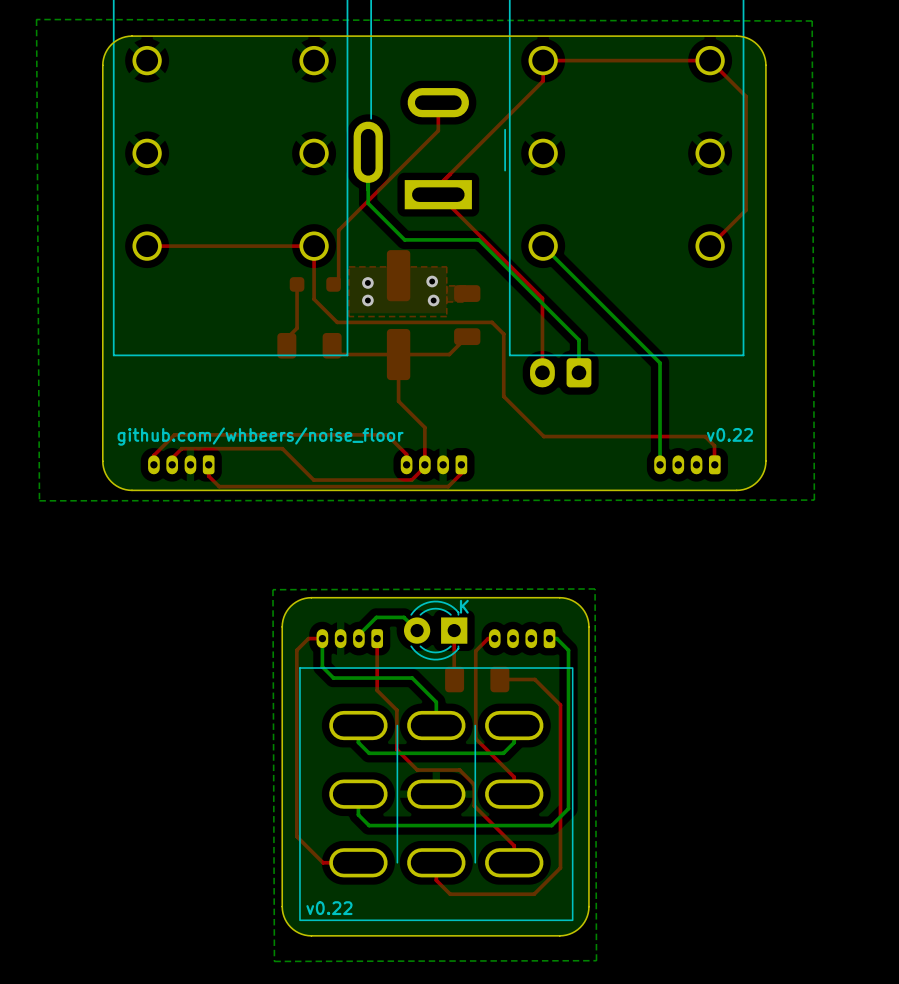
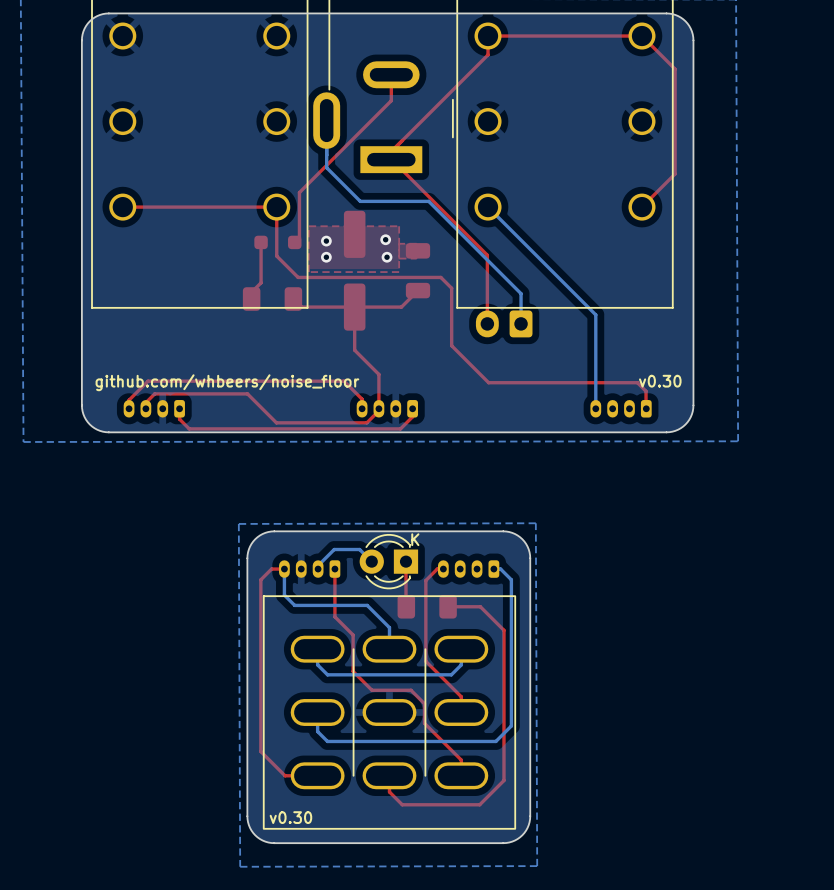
text: github.com/whbeers/noise_floor v0.22 (435, 436) -> github.com/whbeers/noise_floor v0.30 (388, 382)
text: v0.22 (329, 908) -> v0.30 (290, 817)

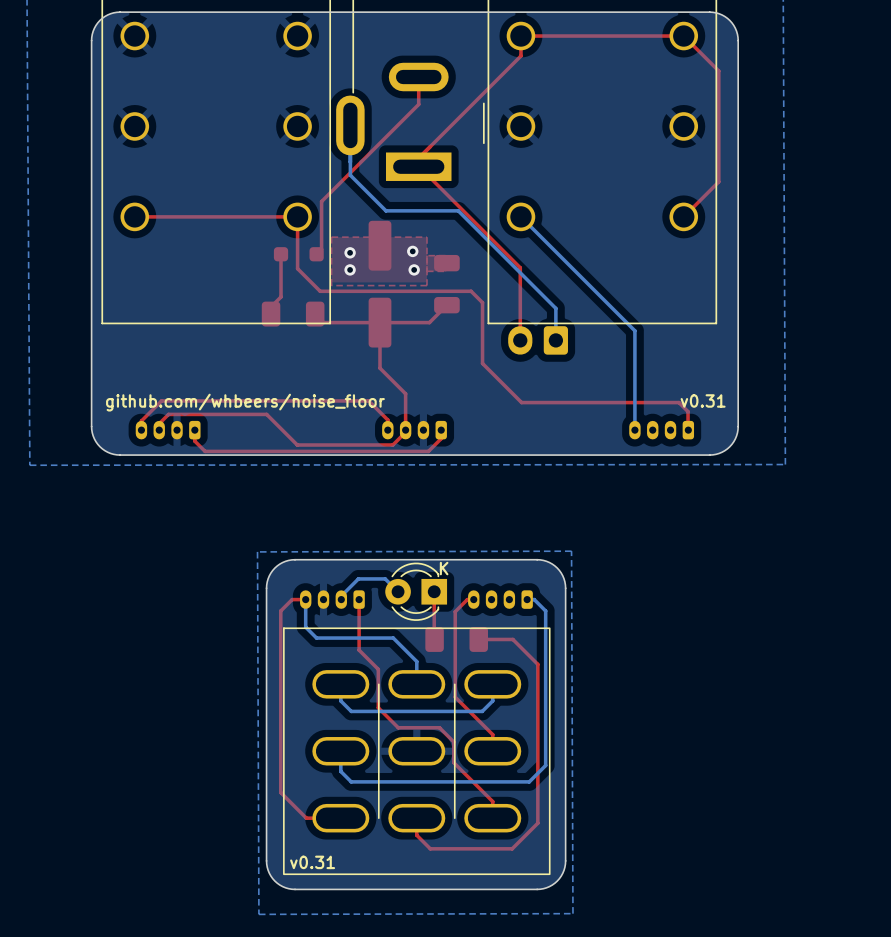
text: github.com/whbeers/noise_floor v0.30 (388, 382) -> github.com/whbeers/noise_floor v0.31 (415, 402)
text: v0.30 (290, 817) -> v0.31 (312, 862)

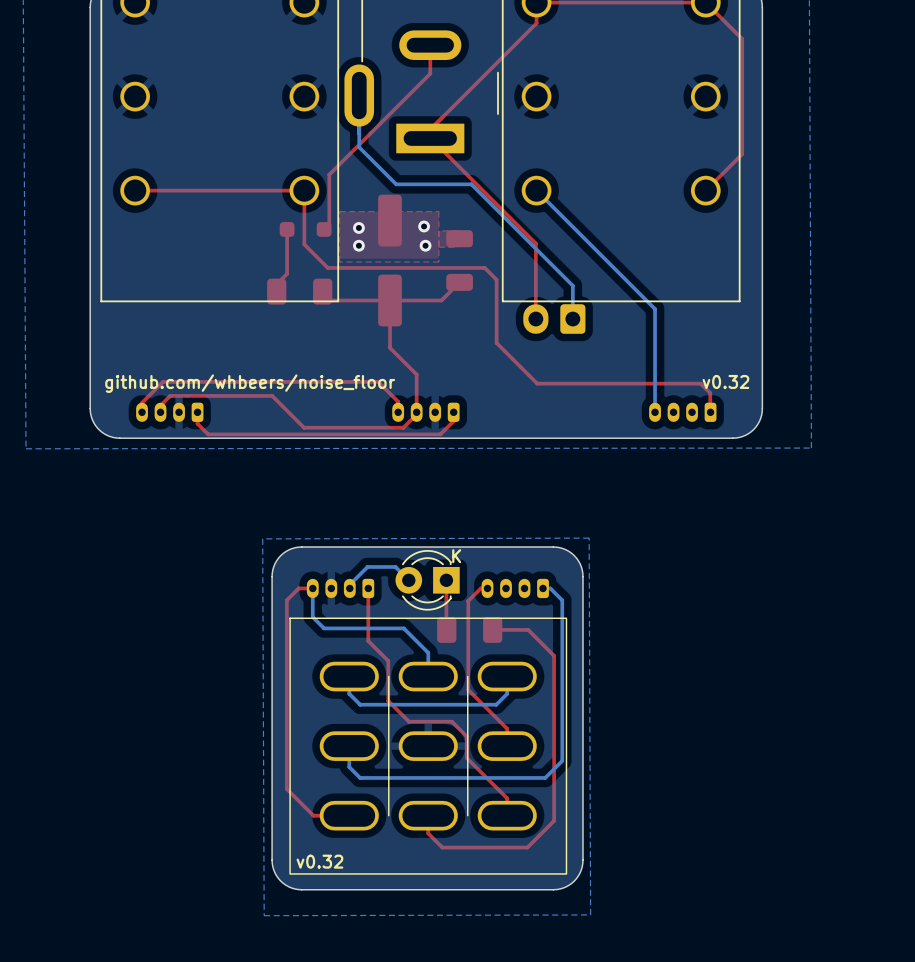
text: github.com/whbeers/noise_floor v0.31 (415, 402) -> github.com/whbeers/noise_floor v0.32 (427, 383)
text: v0.31 (312, 862) -> v0.32 (319, 861)

